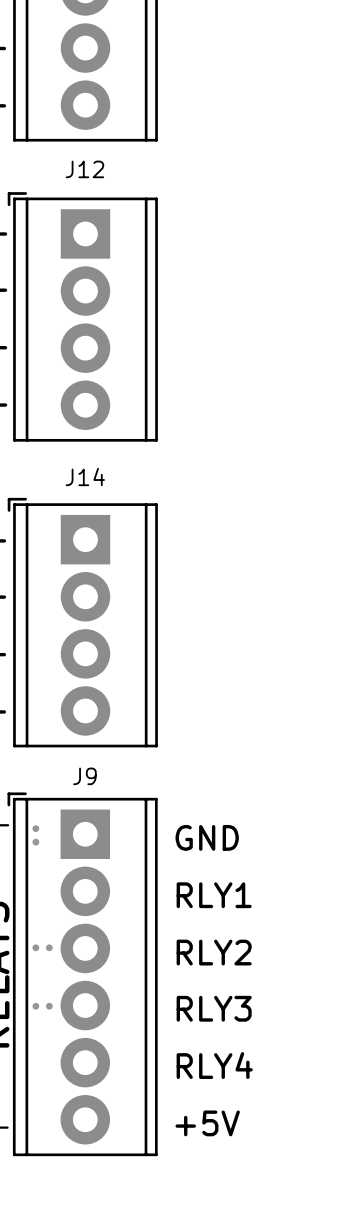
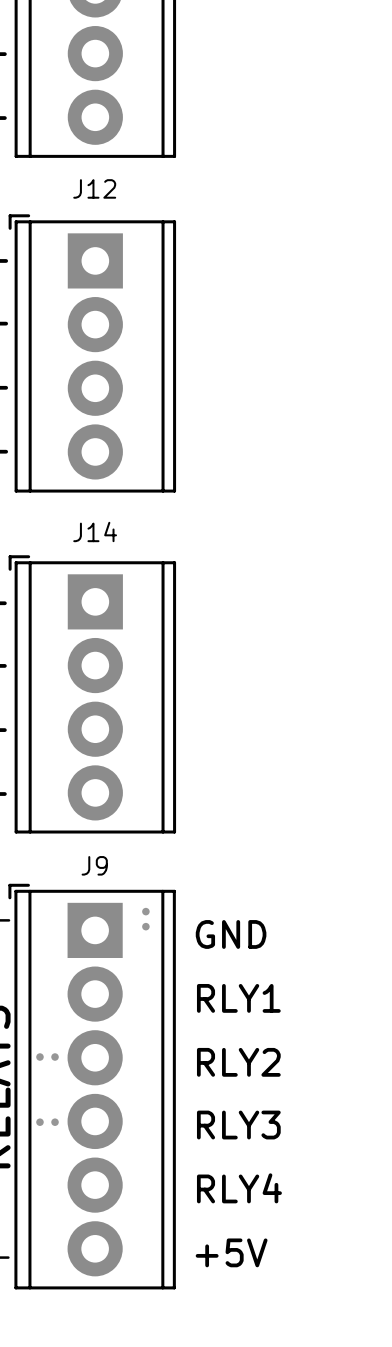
part position: (35, 835) -> (145, 919)

